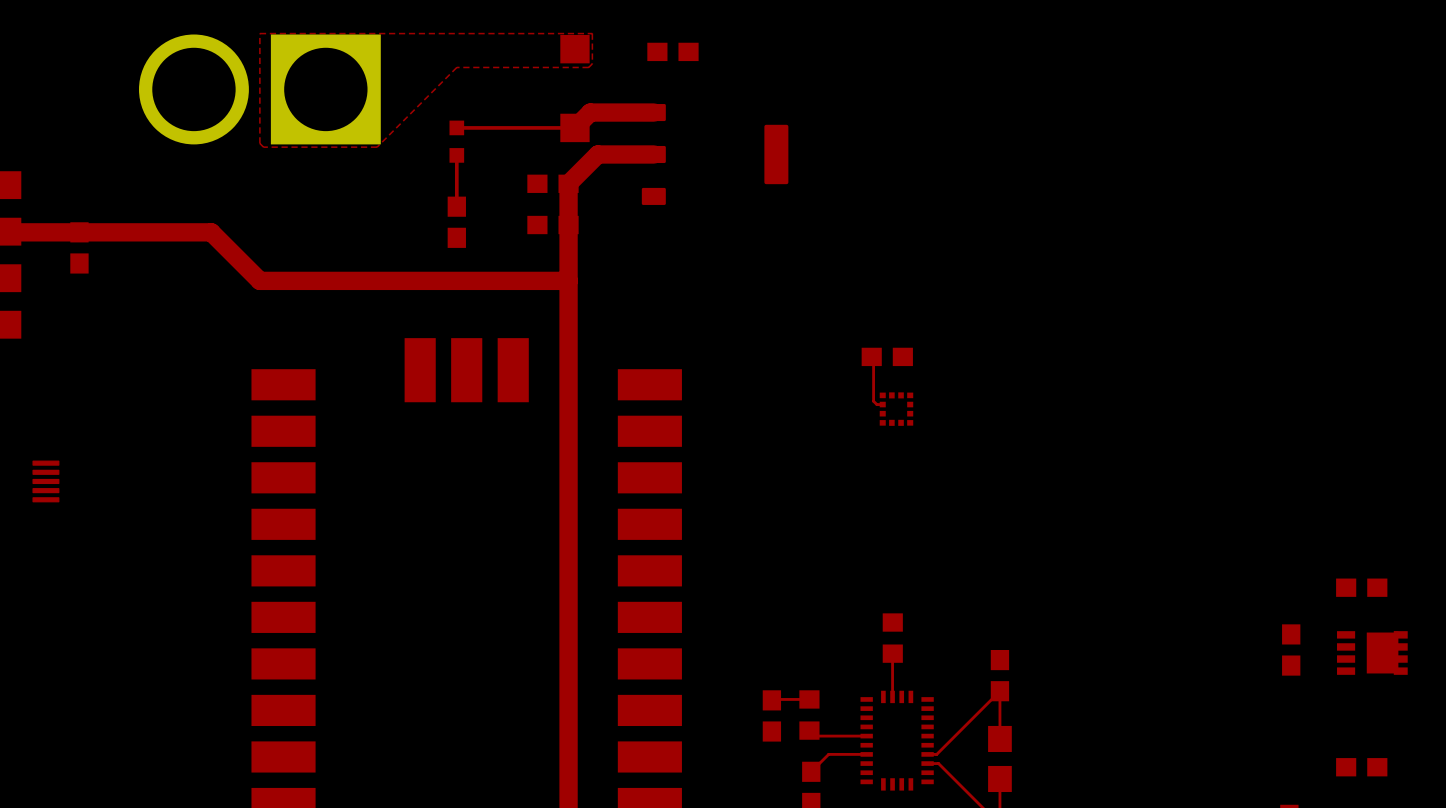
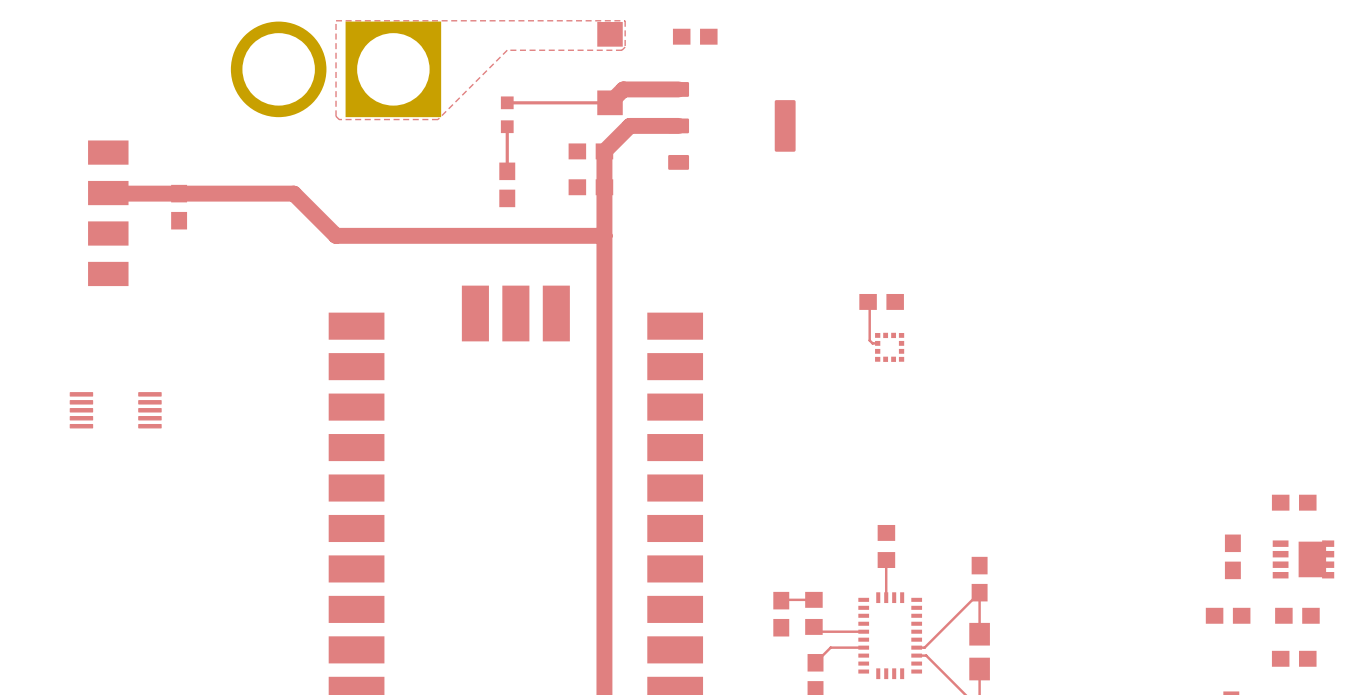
part: none -> (1228, 615)
part: none -> (1297, 615)

